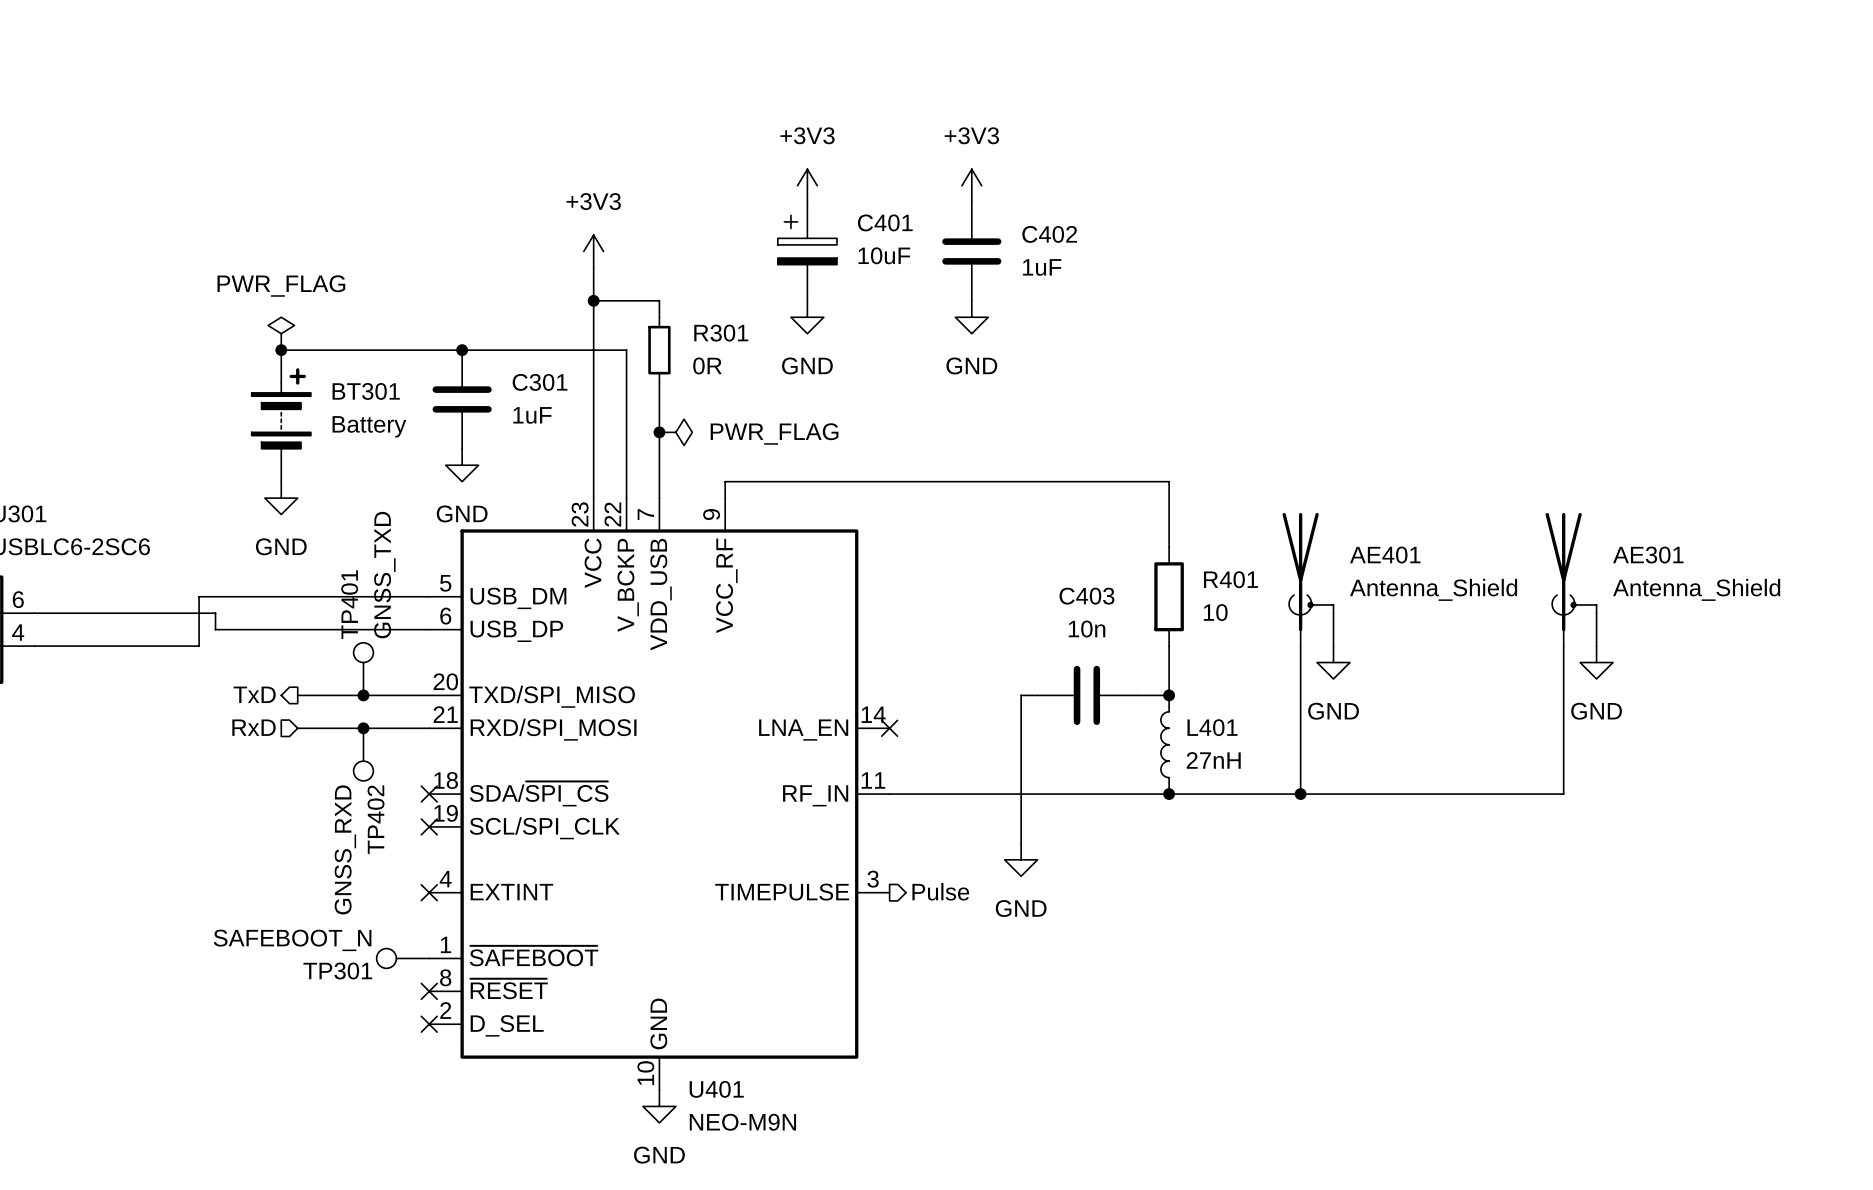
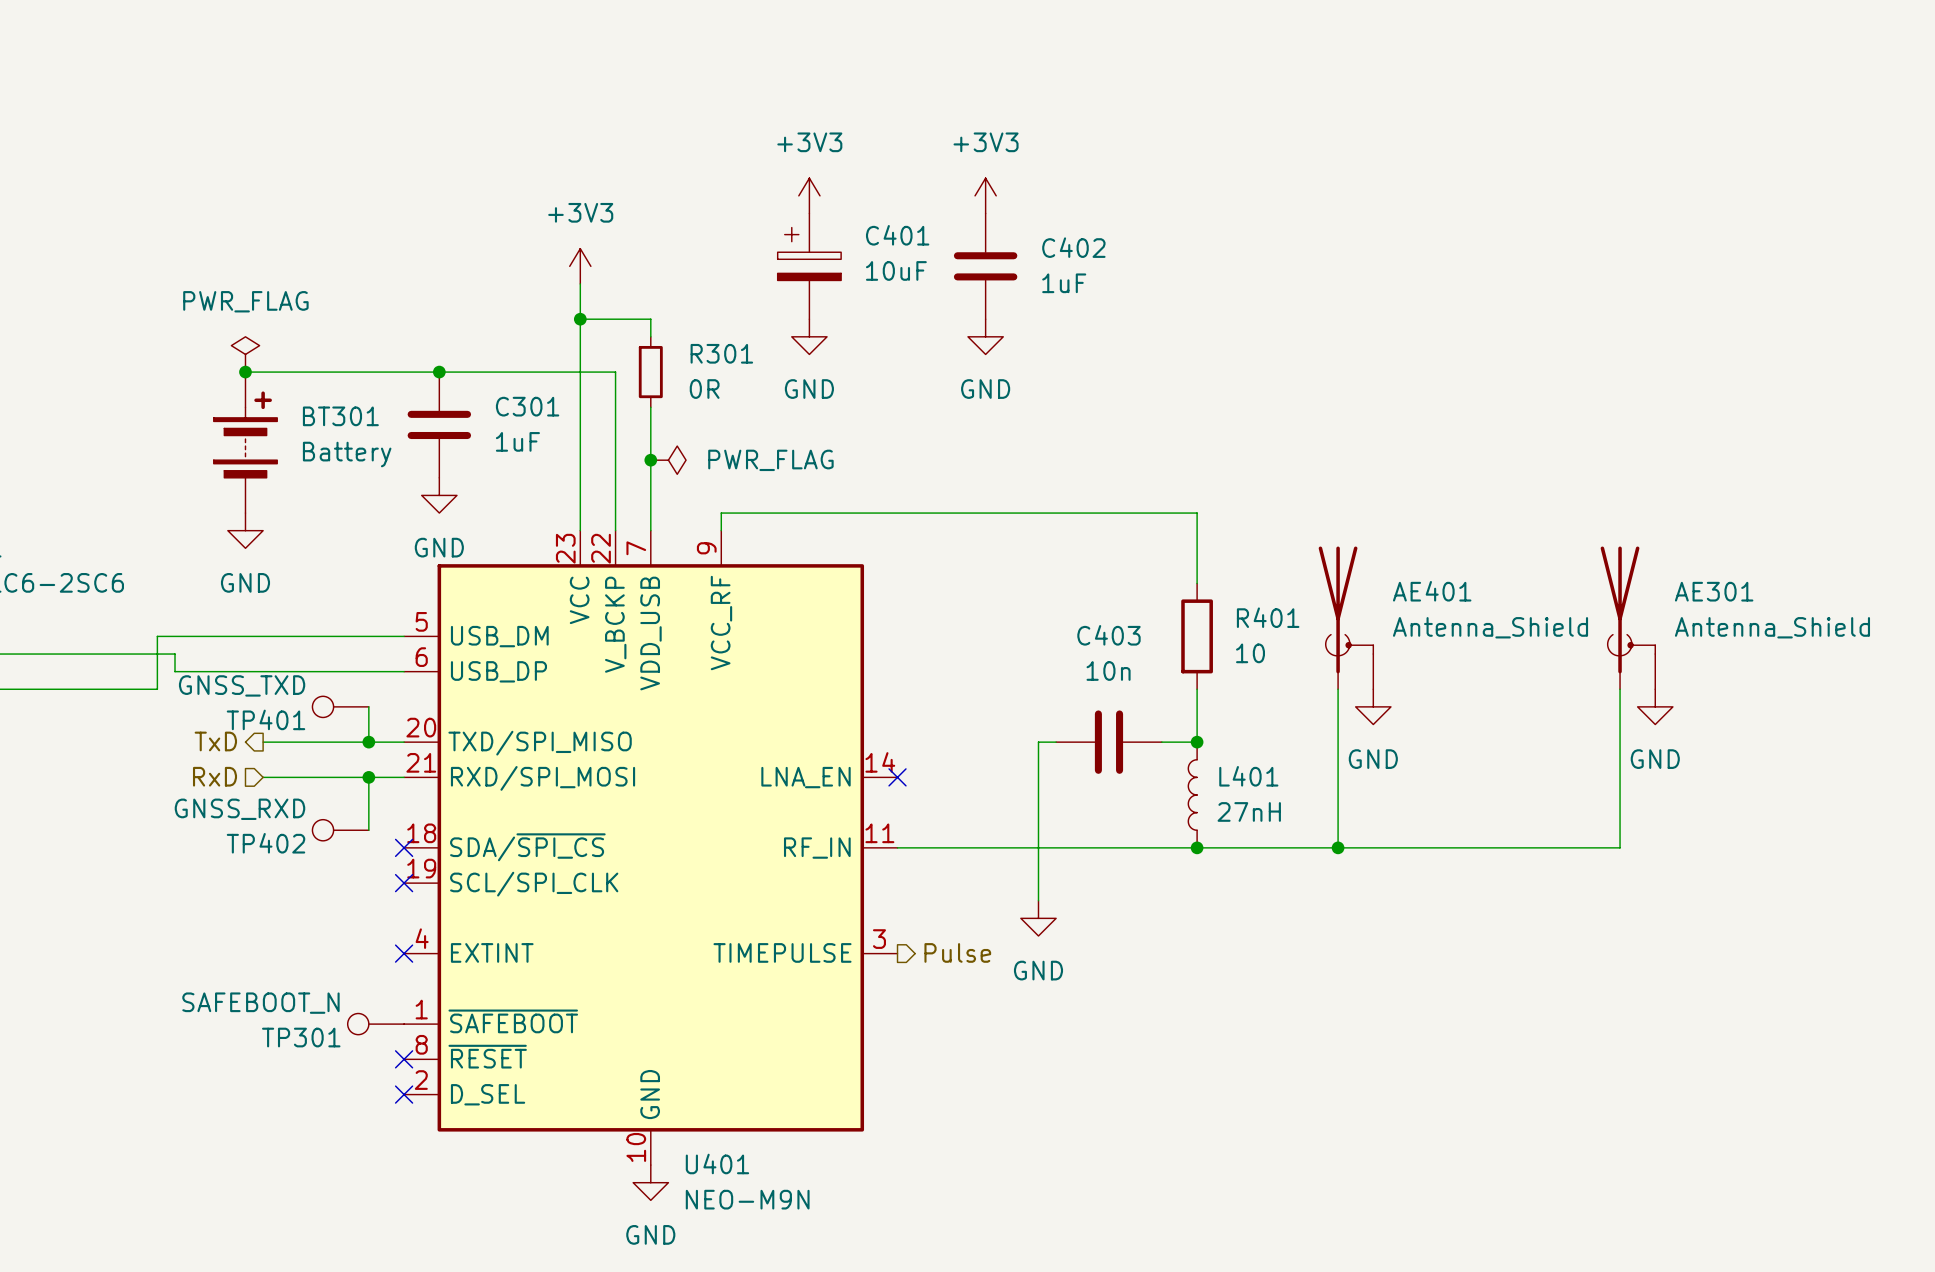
TP401 rotation: 0° (363, 652) -> 90° counterclockwise (323, 706)
wire: none -> (368, 706) (368, 742)
junction: (363, 695) -> none
junction: none -> (368, 742)
junction: (363, 728) -> none
wire: none -> (368, 777) (368, 830)
junction: none -> (368, 777)
TP402 rotation: 0° (363, 771) -> 90° clockwise (323, 830)

